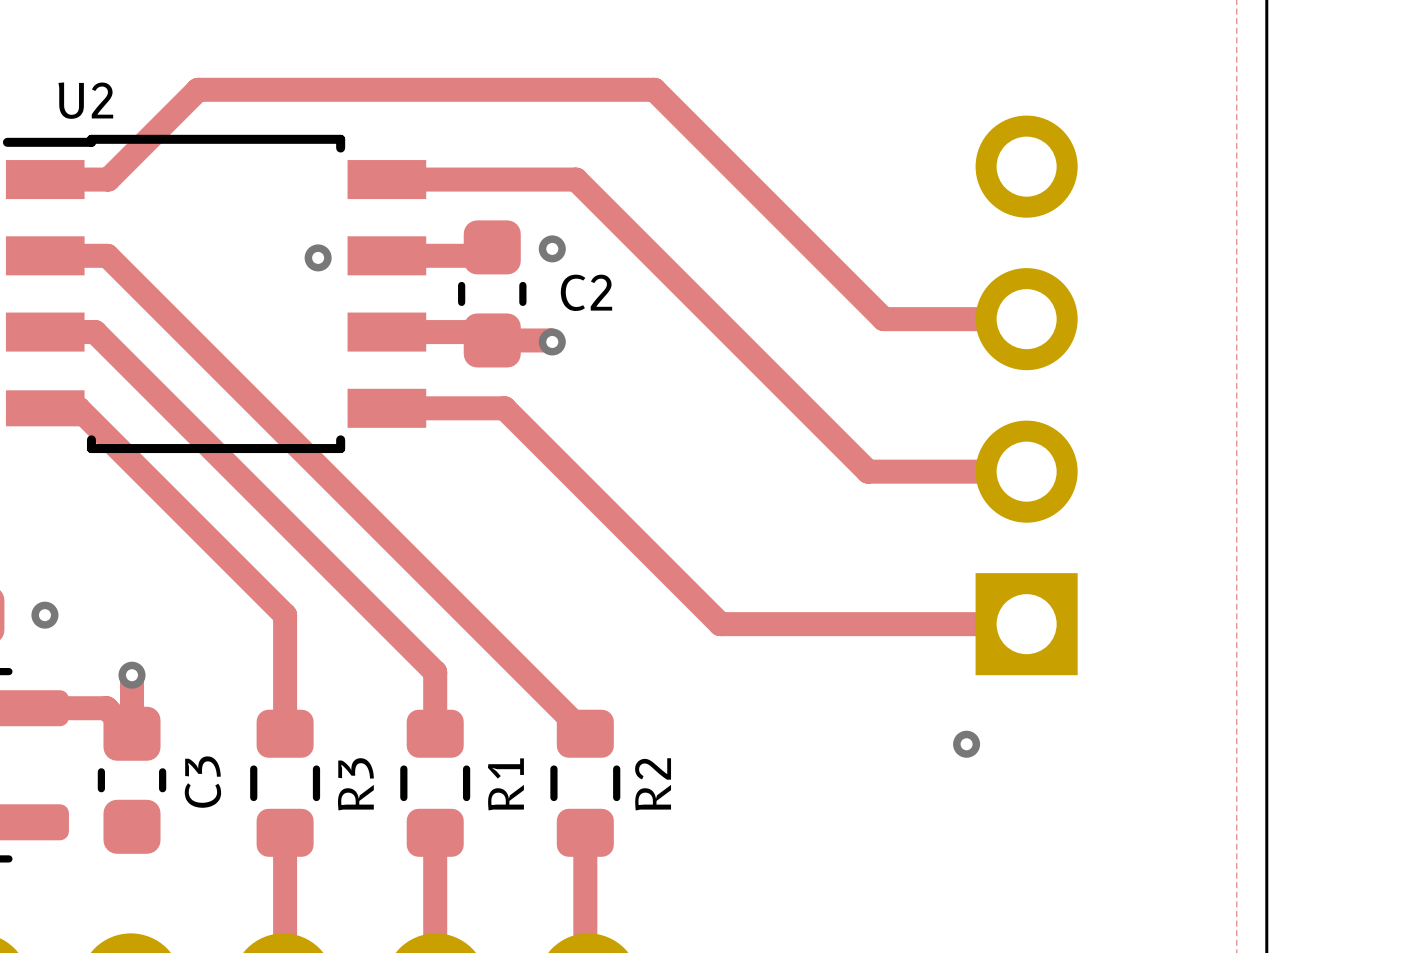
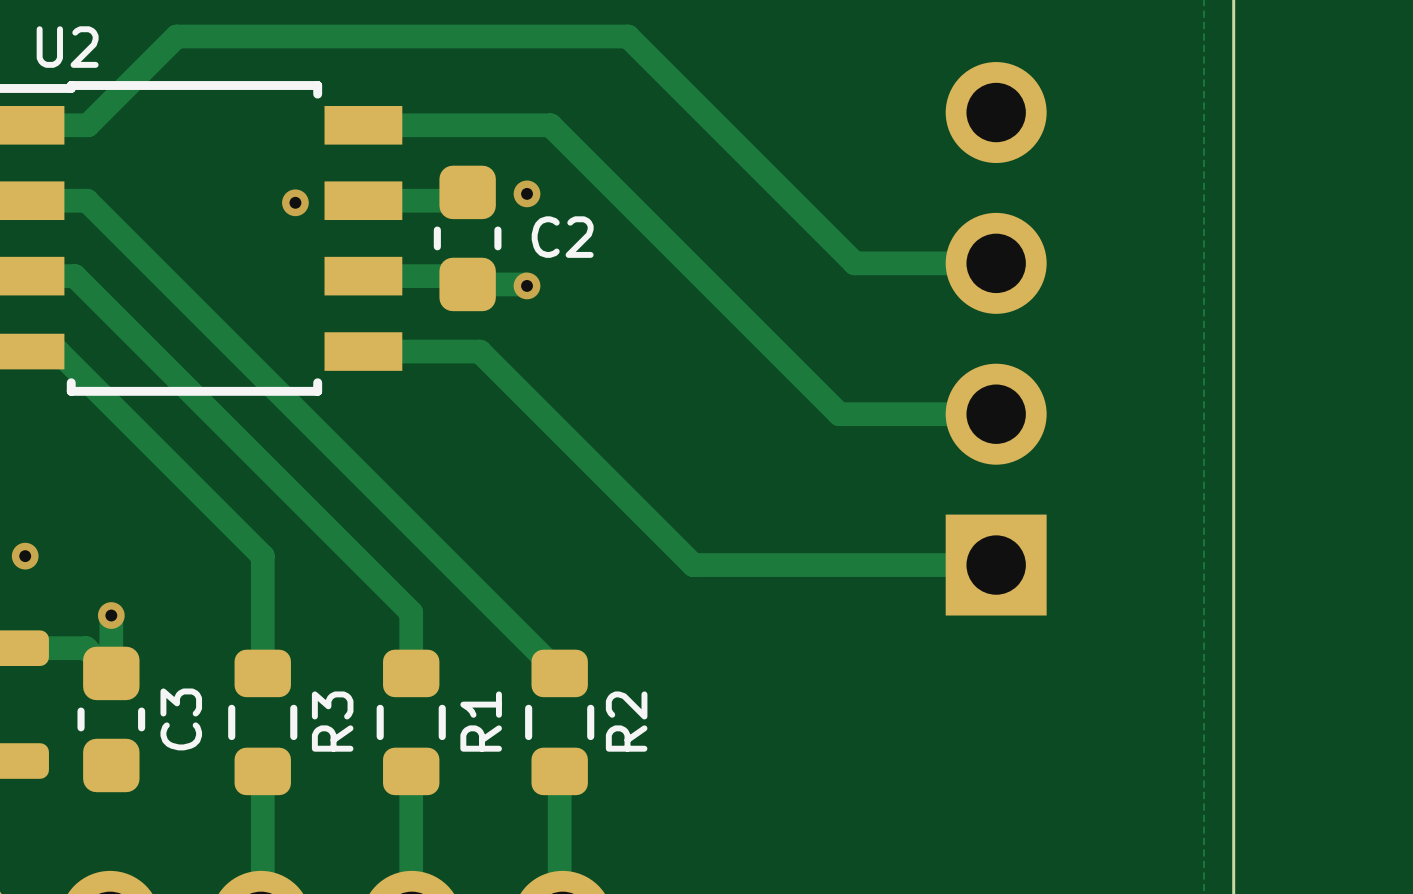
via: (966, 744) -> none

